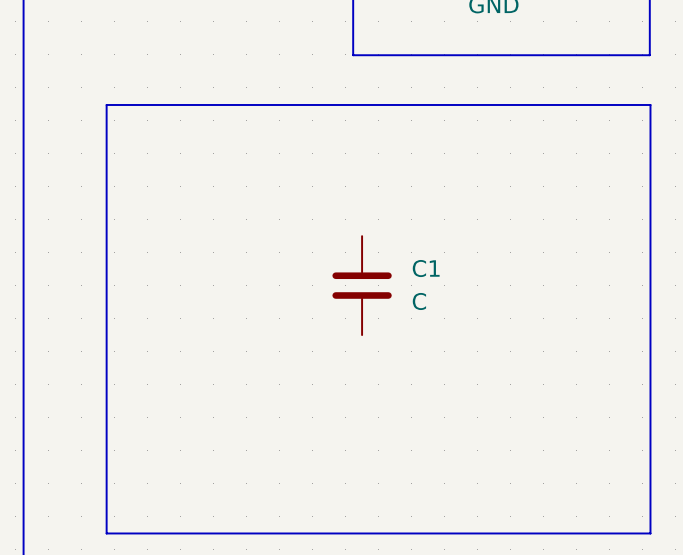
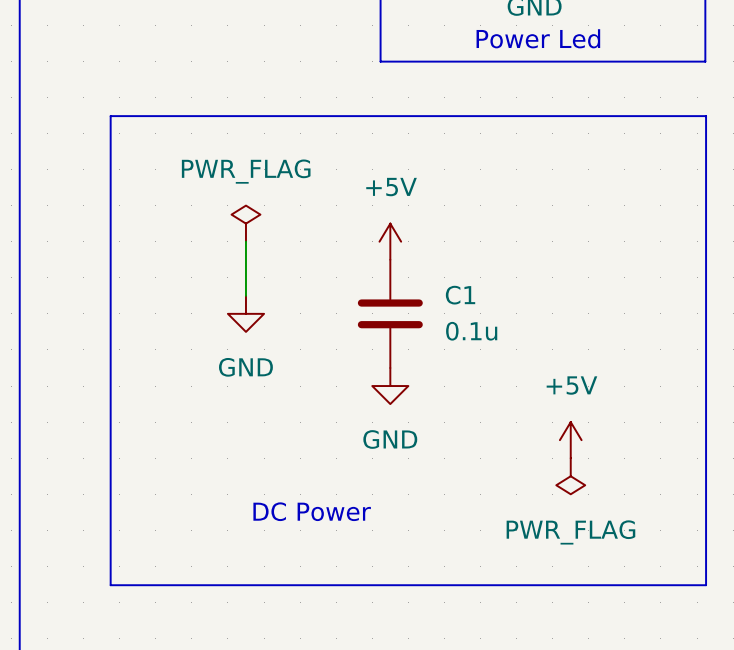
text: none -> Power Led (538, 38)
power symbol: none -> PWR_FLAG (245, 223)
wire: none -> (245, 241) (245, 295)
power symbol: none -> +5V (390, 241)
power symbol: none -> GND (245, 313)
C1 value: C (419, 301) -> 0.1u (471, 331)
power symbol: none -> GND (390, 386)
power symbol: none -> +5V (570, 440)
power symbol: none -> PWR_FLAG (570, 476)
text: none -> DC Power (312, 511)

